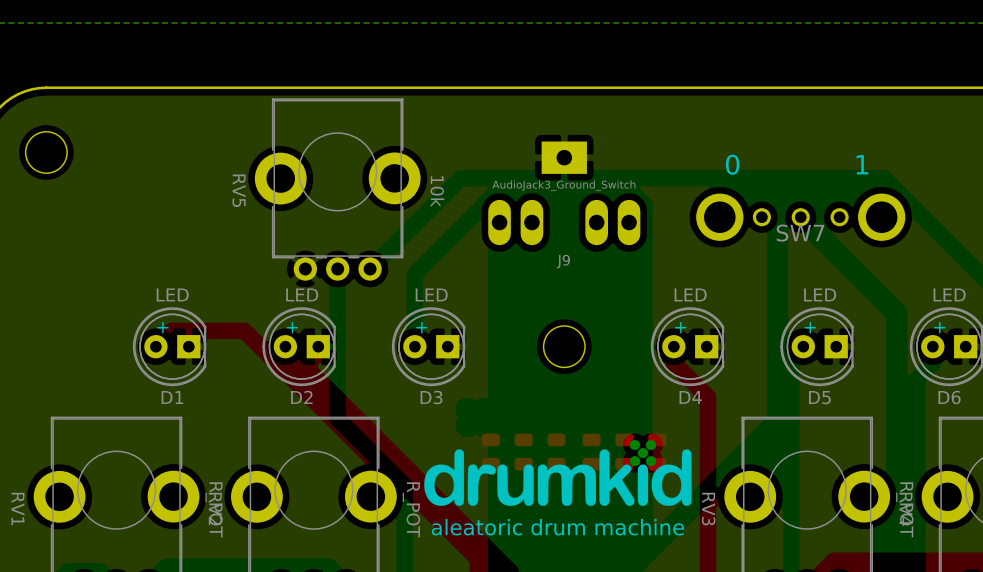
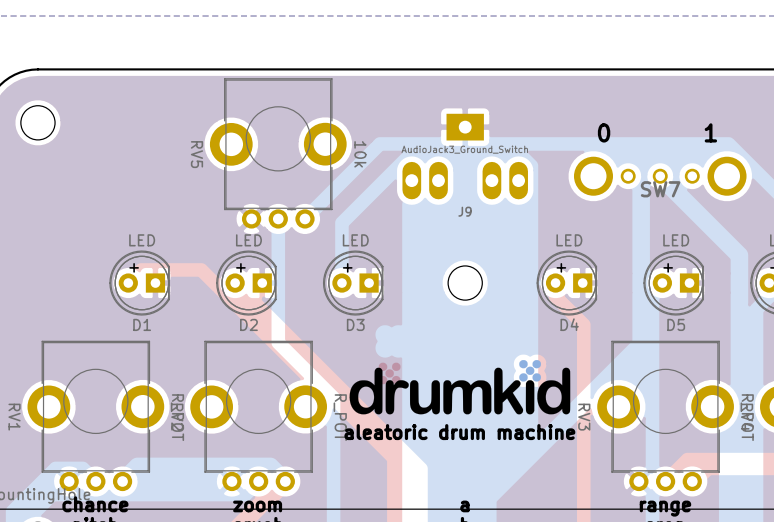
drawing: none -> [378, 362, 401, 385]
part: (490, 452) -> none
part: (523, 452) -> none
part: (556, 452) -> none
part: (591, 452) -> none
part: (624, 452) -> none
part: (657, 452) -> none

